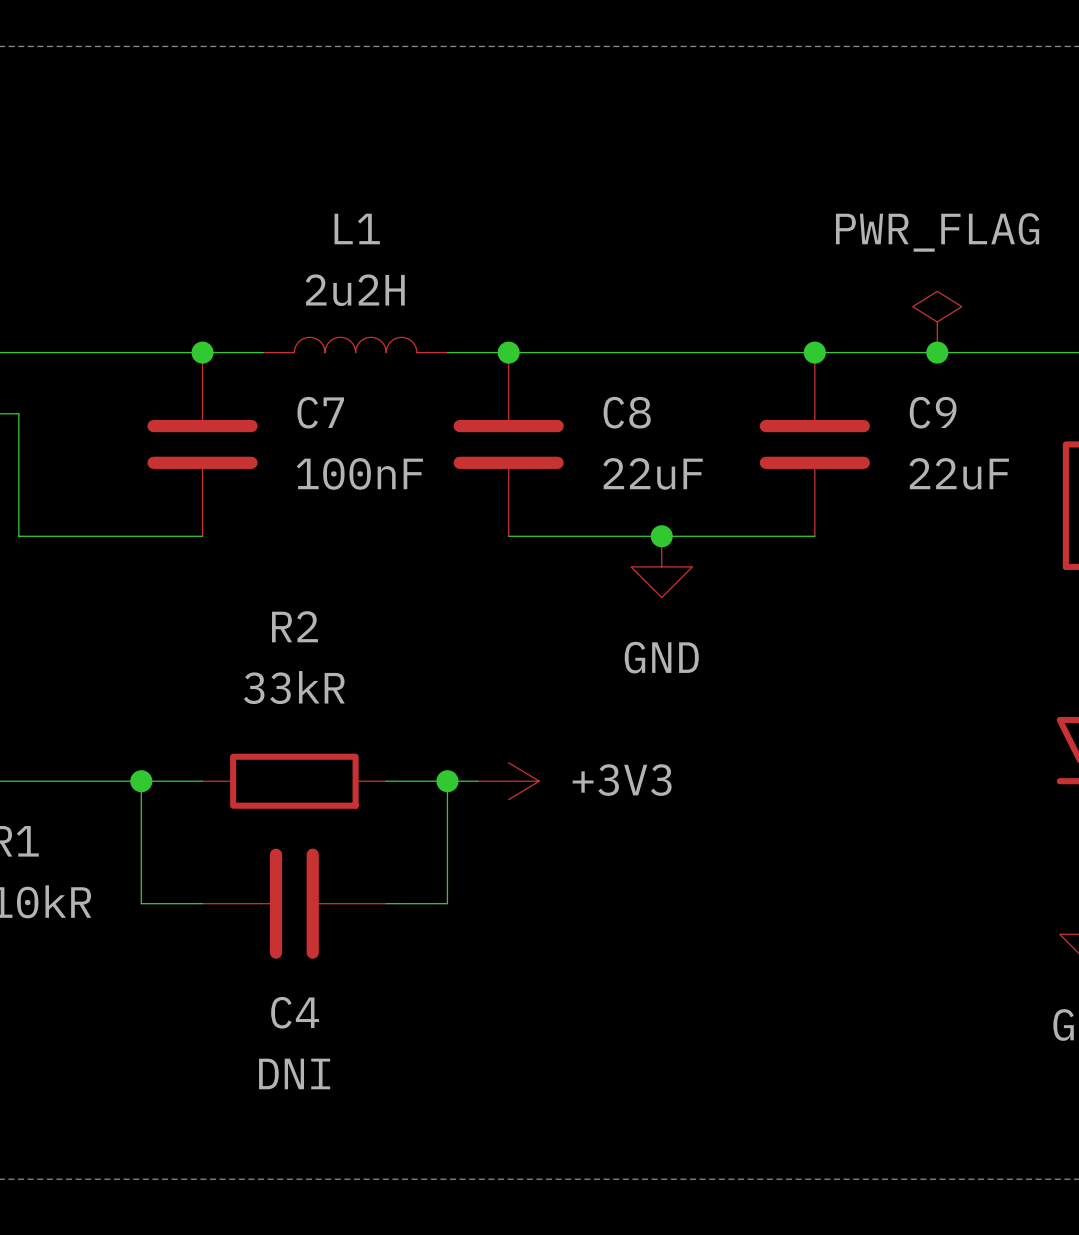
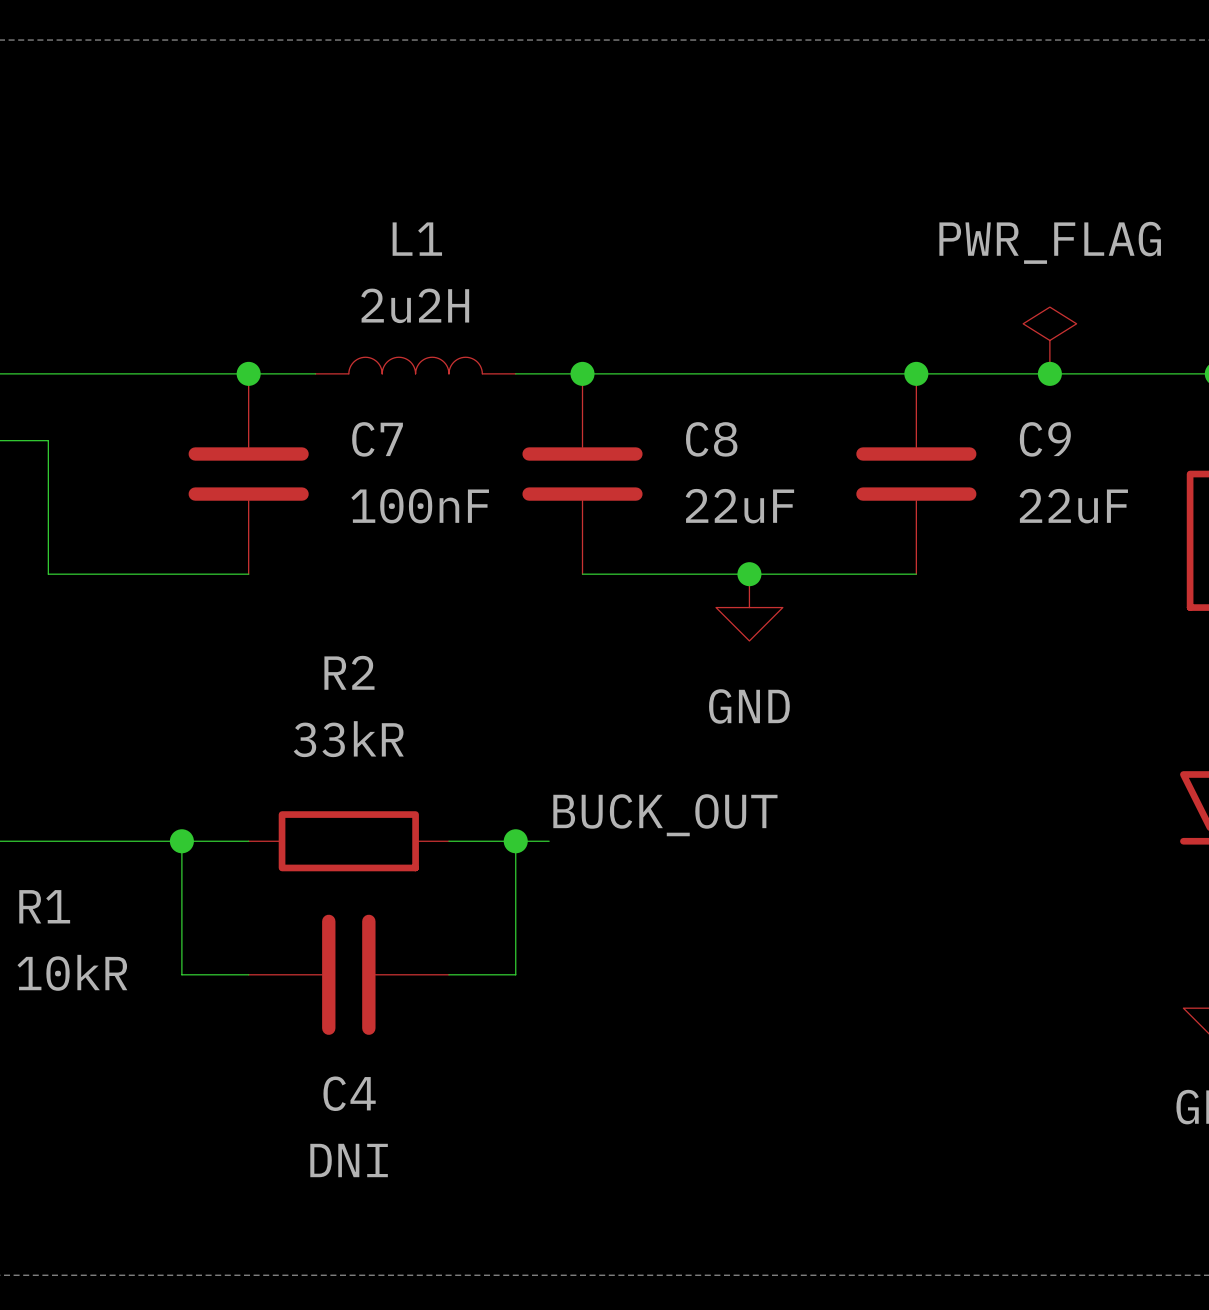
label: none -> BUCK_OUT (665, 815)
power symbol: +3V3 (508, 781) -> none

